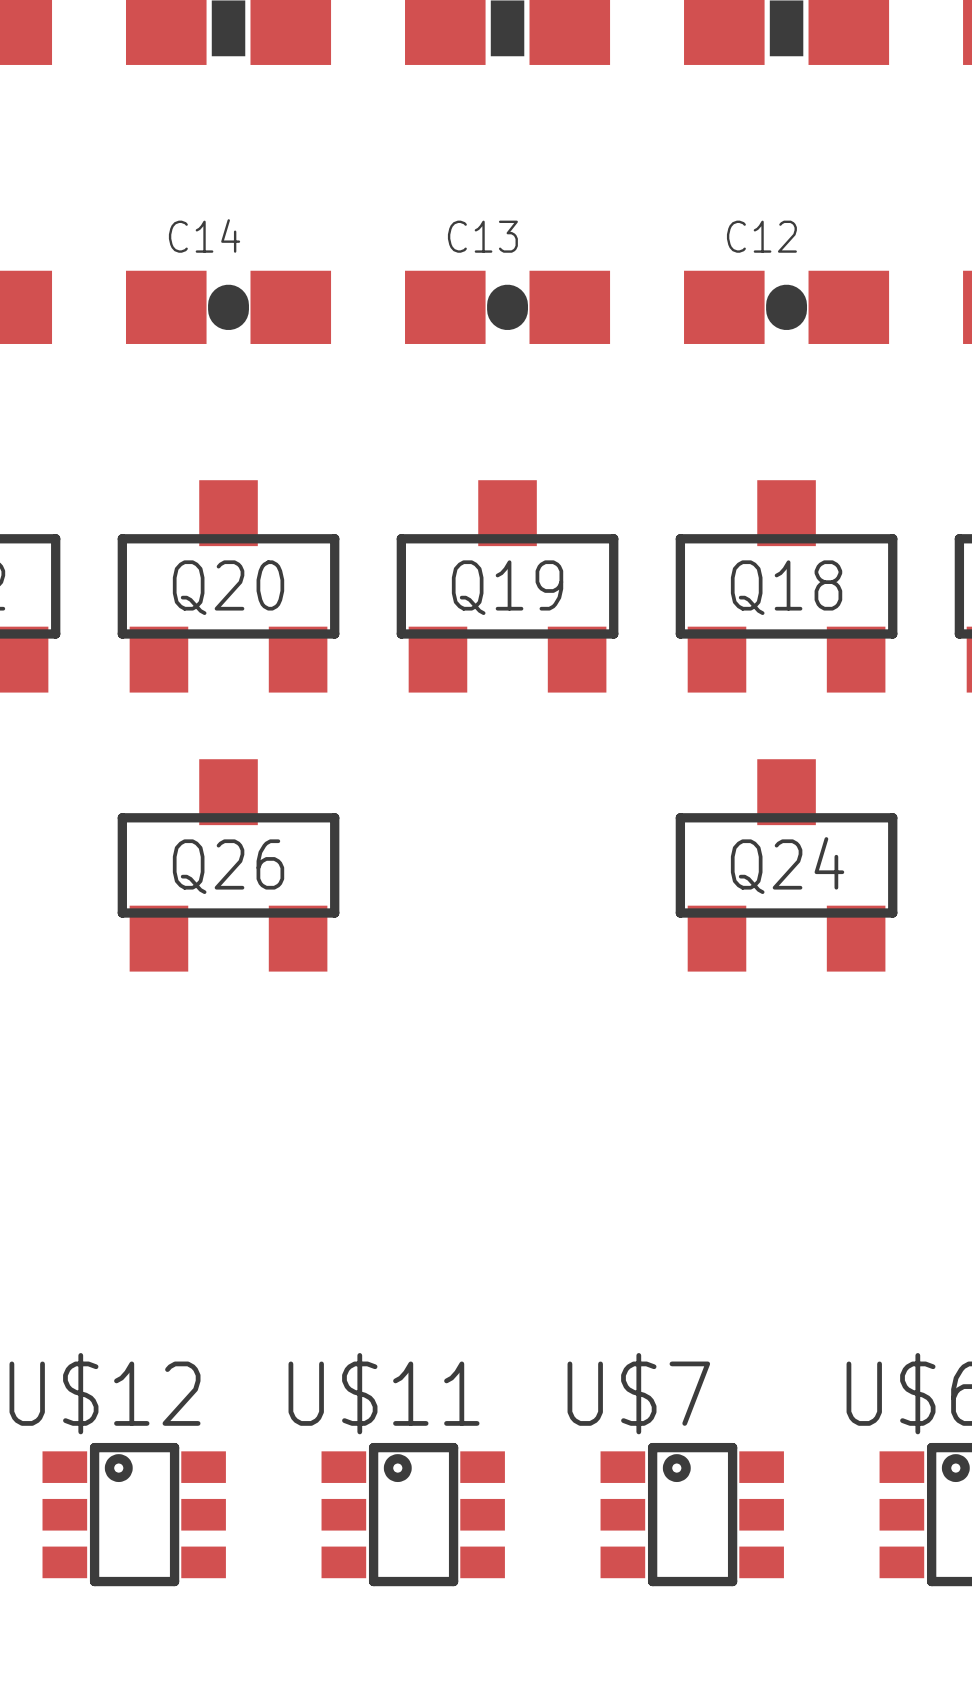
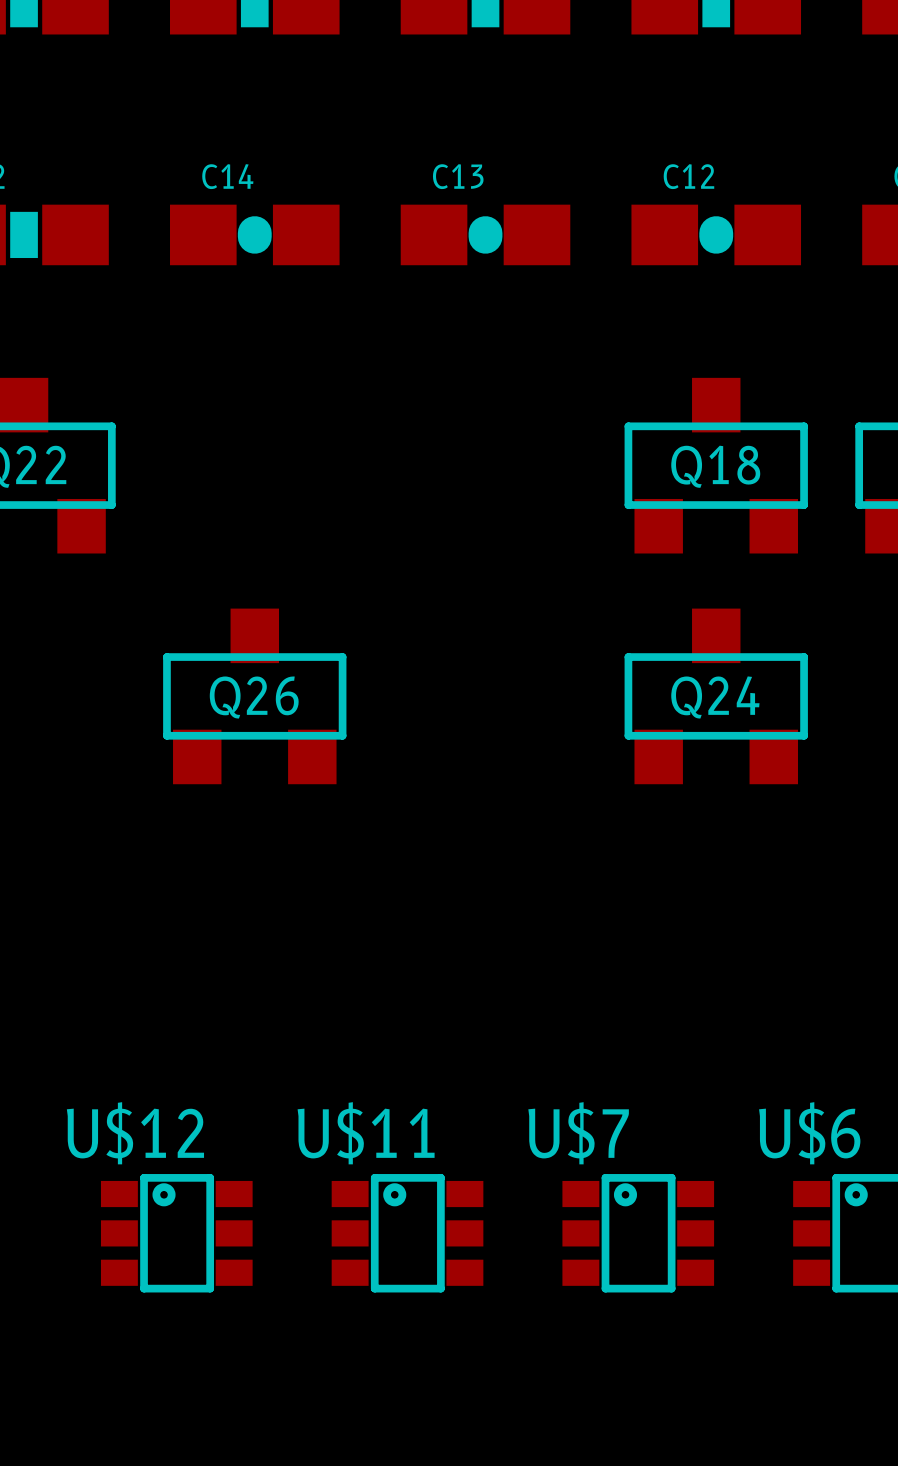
Q20: (228, 586) -> none
Q19: (507, 586) -> none

